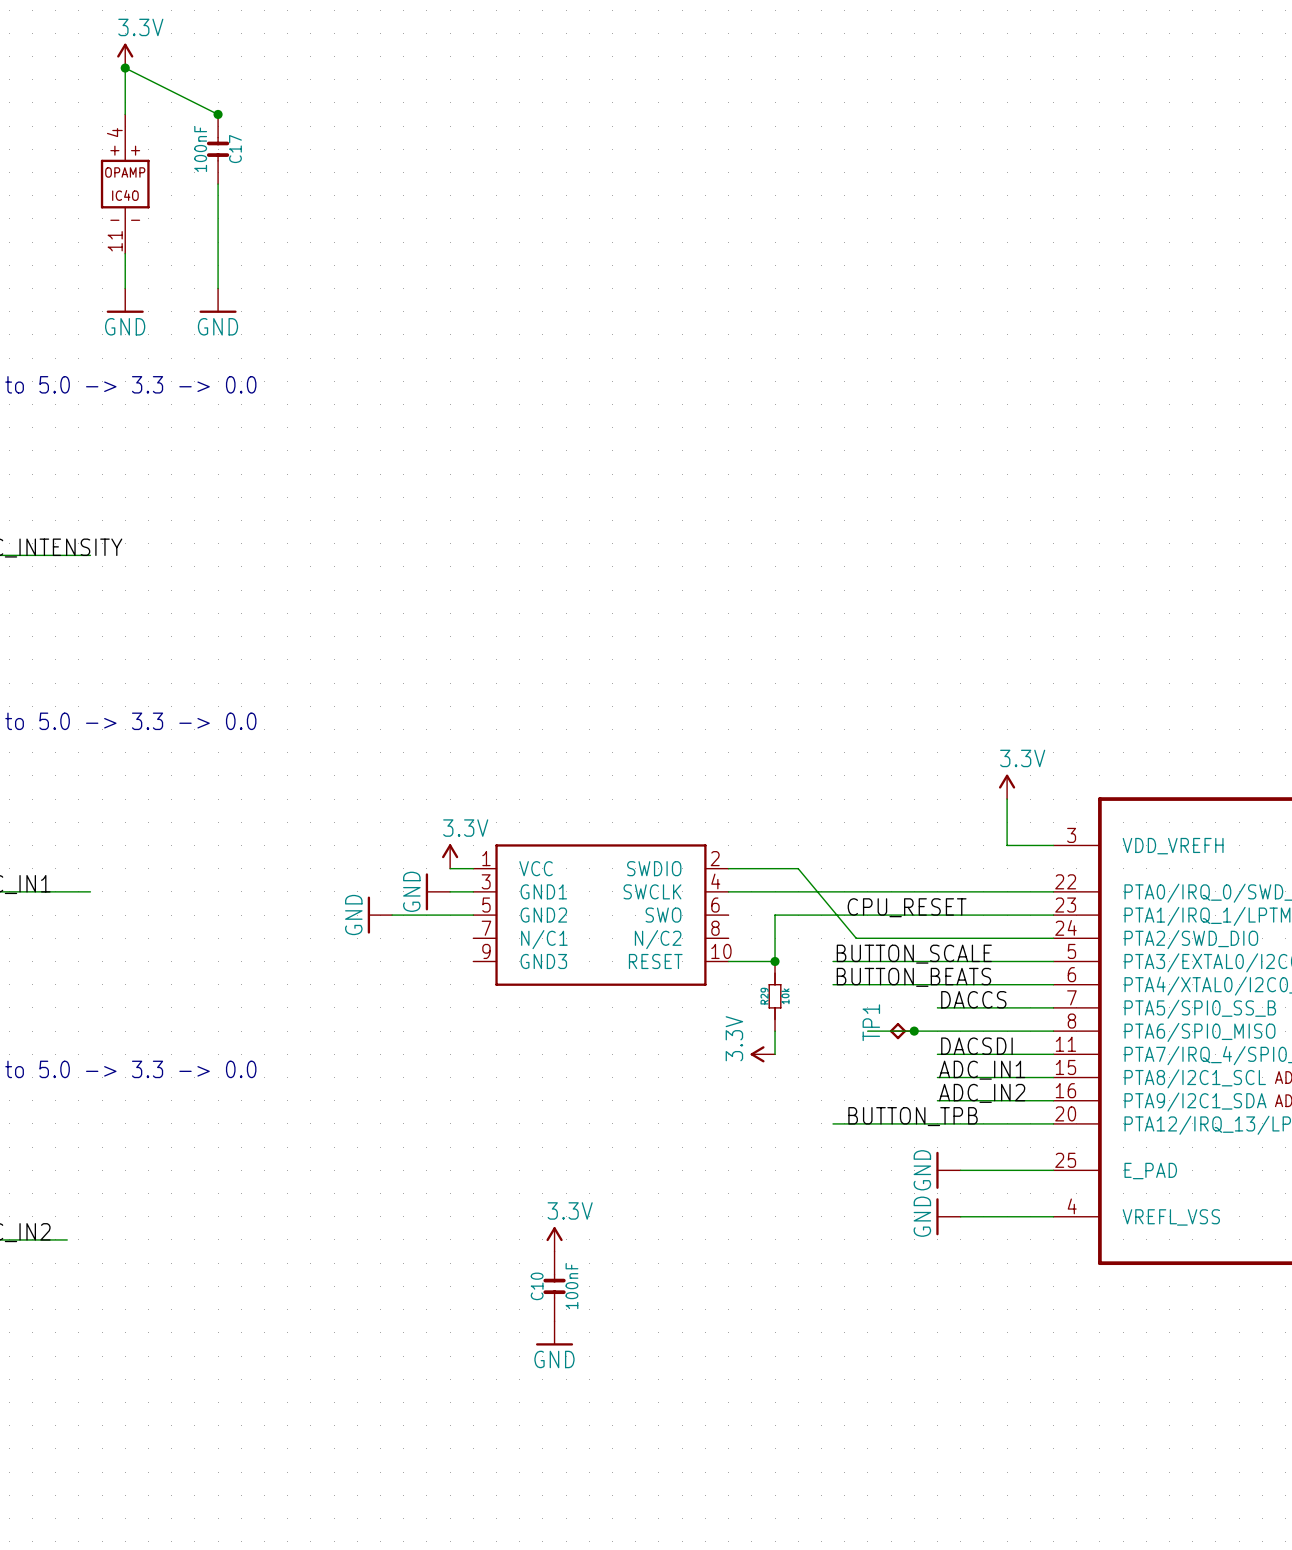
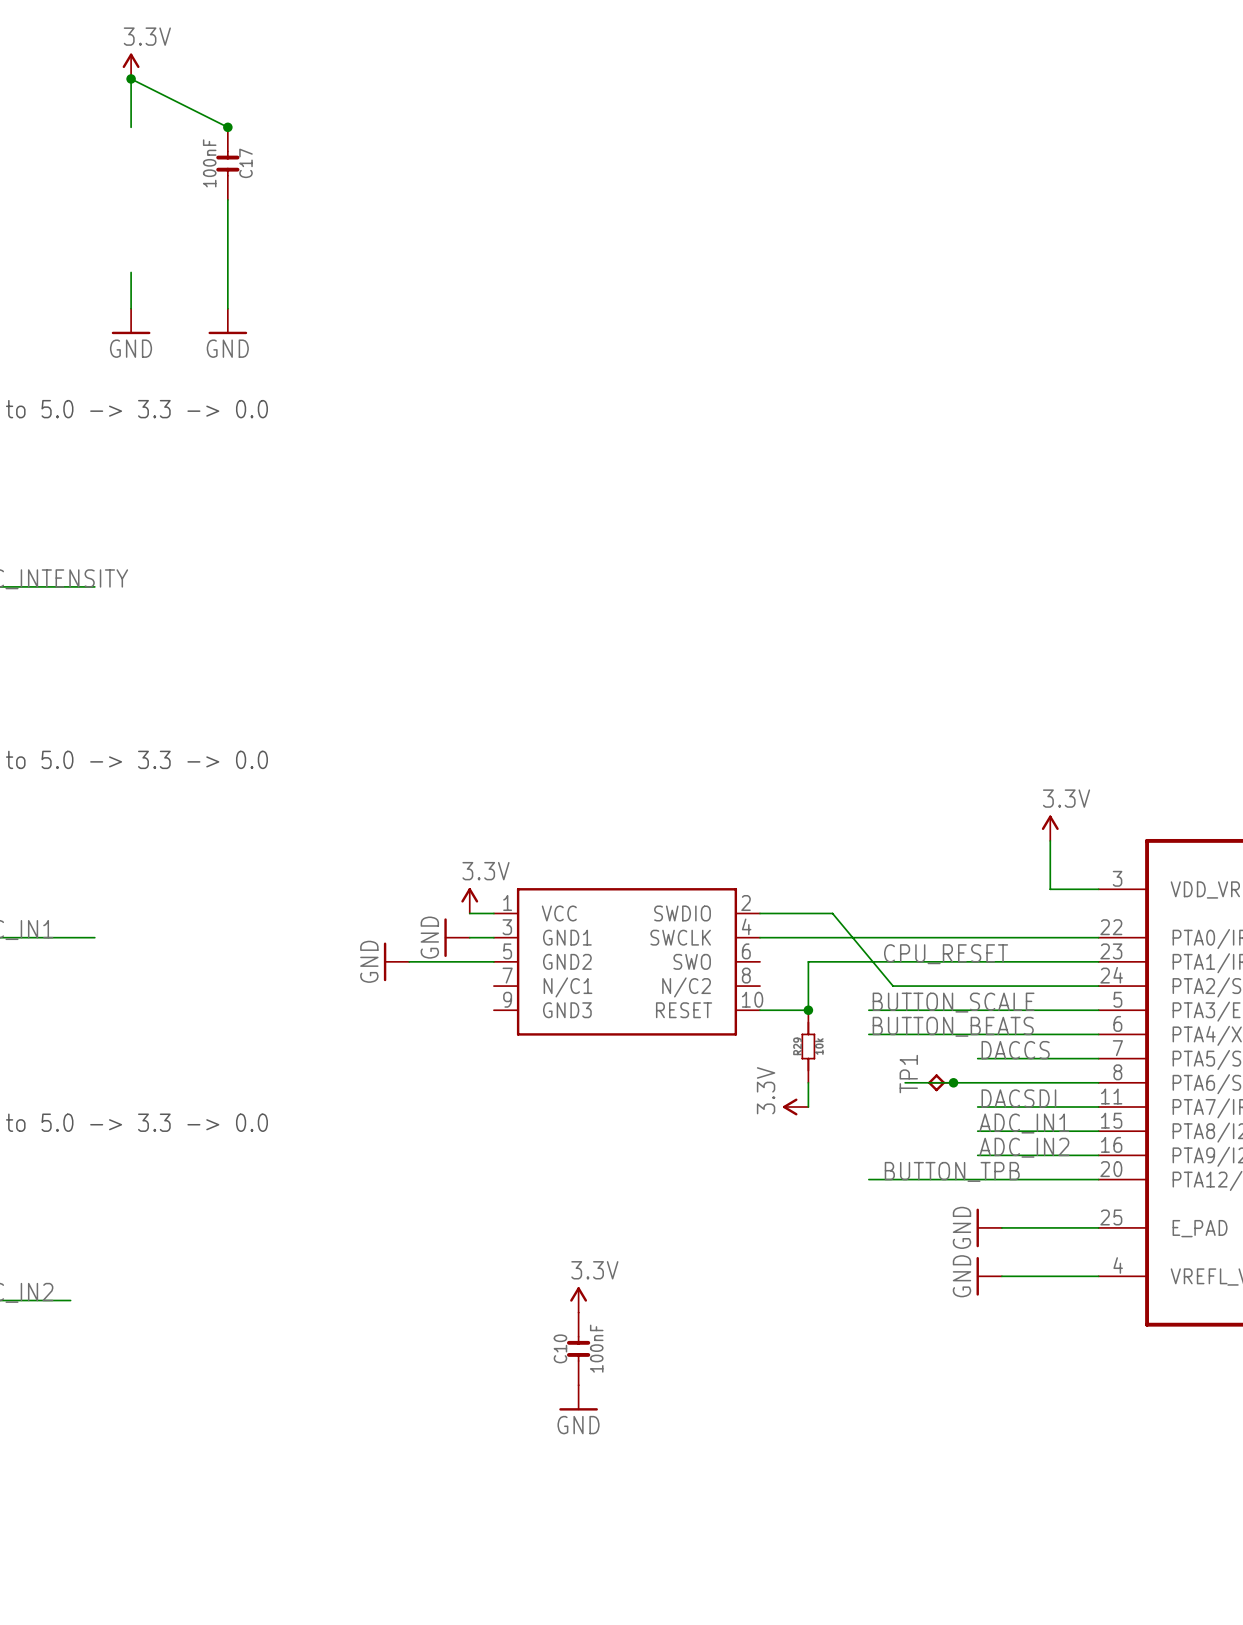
IC4O: (125, 184) -> none

